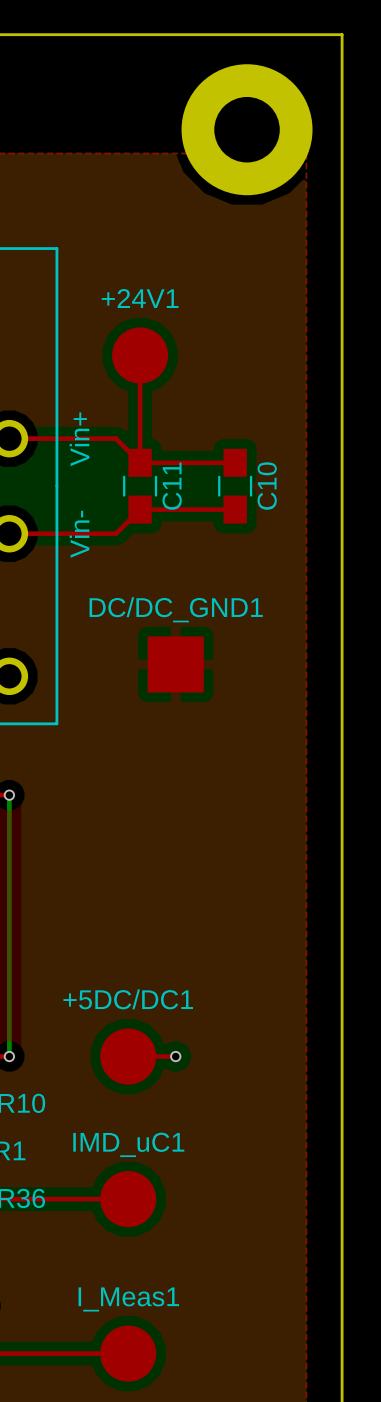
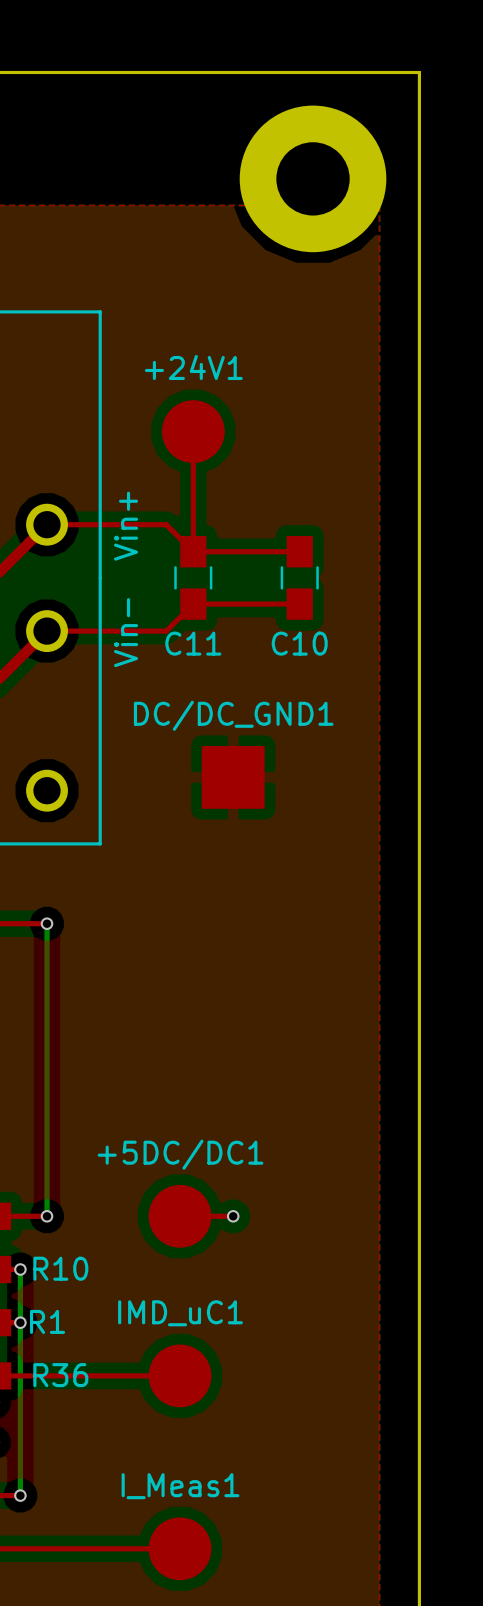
C11 name rotation: 0° (172, 486) -> 90° clockwise (193, 643)
C11 name position: C11 (172, 486) -> C11 (193, 643)
C10 name rotation: 0° (267, 486) -> 90° clockwise (299, 643)
C10 name position: C10 (267, 486) -> C10 (299, 643)

